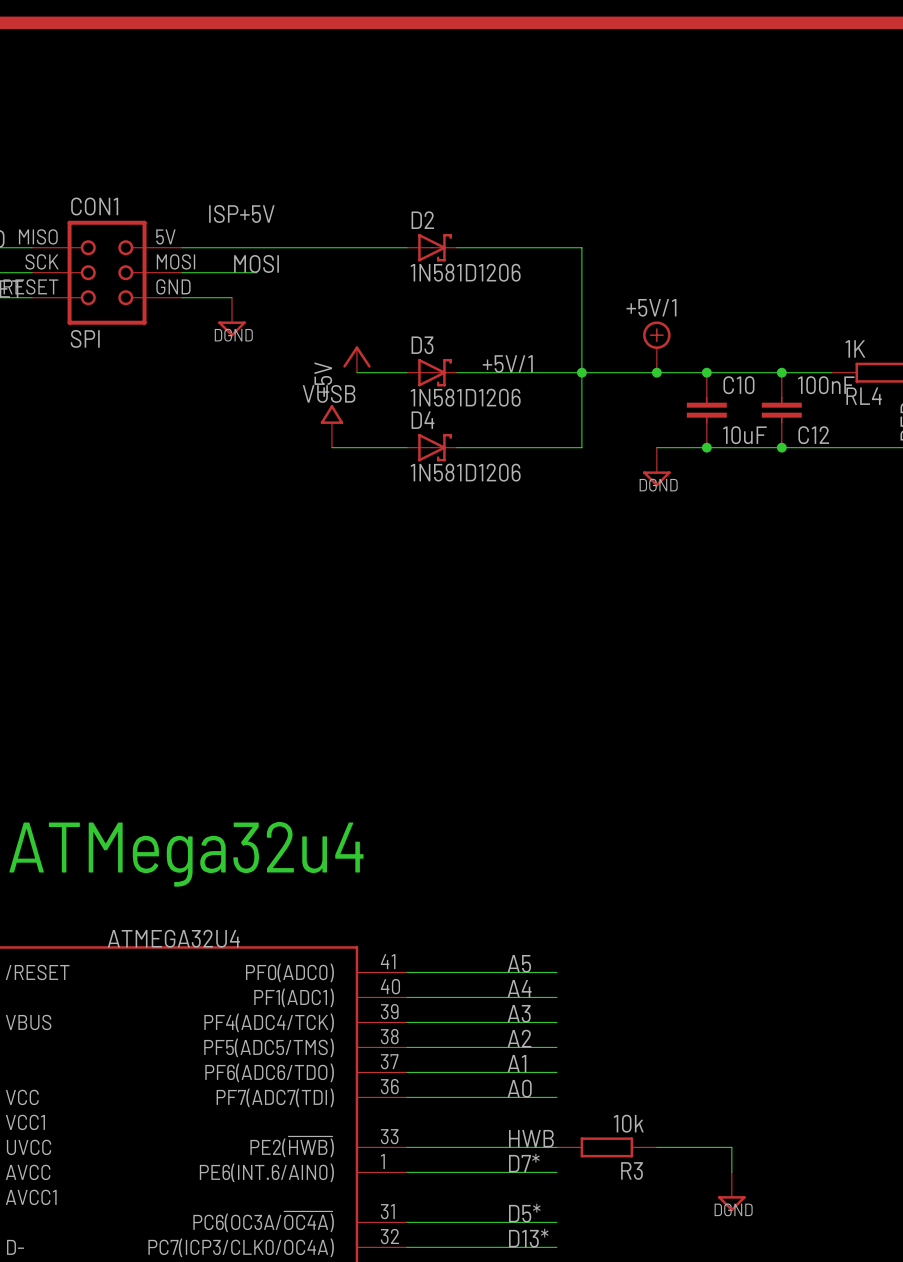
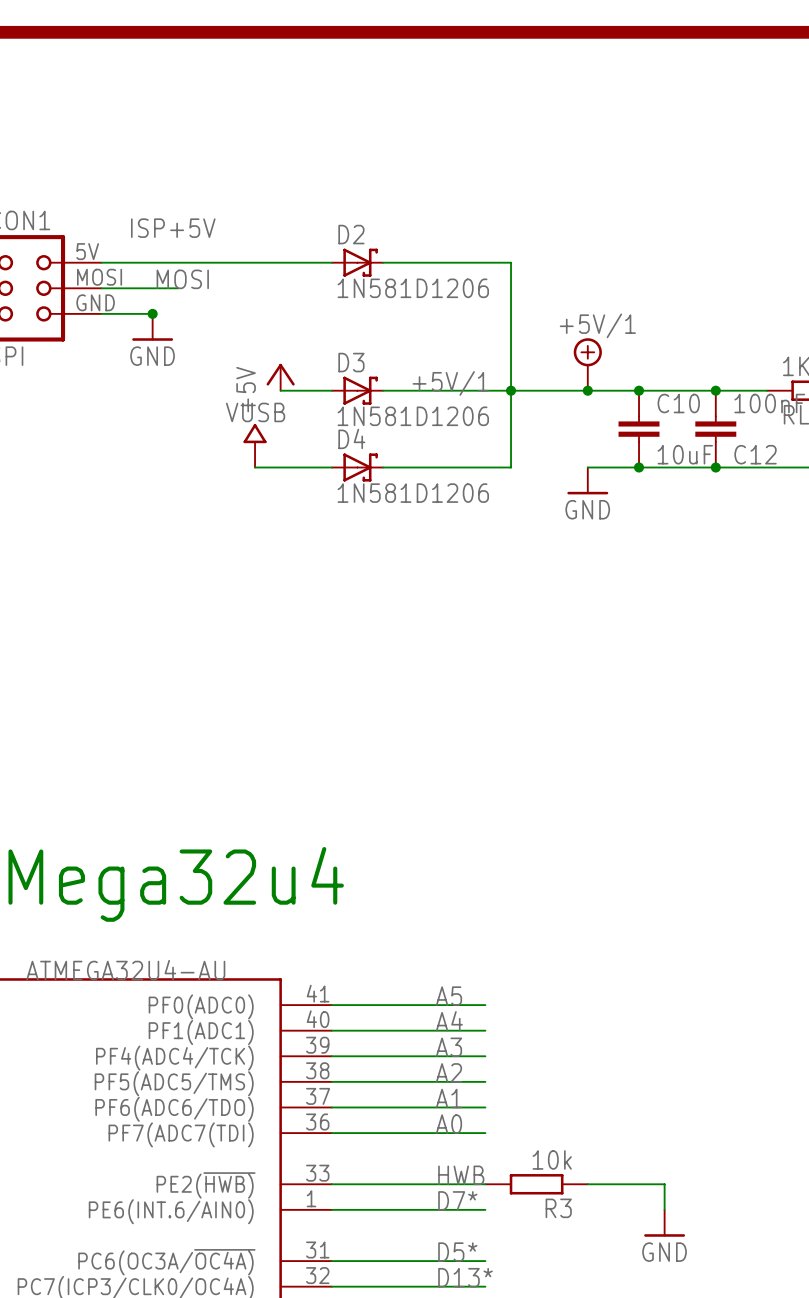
junction: none -> (152, 313)
power symbol: DGND (232, 317) -> GND (152, 327)
power symbol: DGND (656, 467) -> GND (587, 480)
part value: ATMEGA32U4 (173, 938) -> ATMEGA32U4-AU (125, 970)
power symbol: DGND (731, 1191) -> GND (664, 1223)

